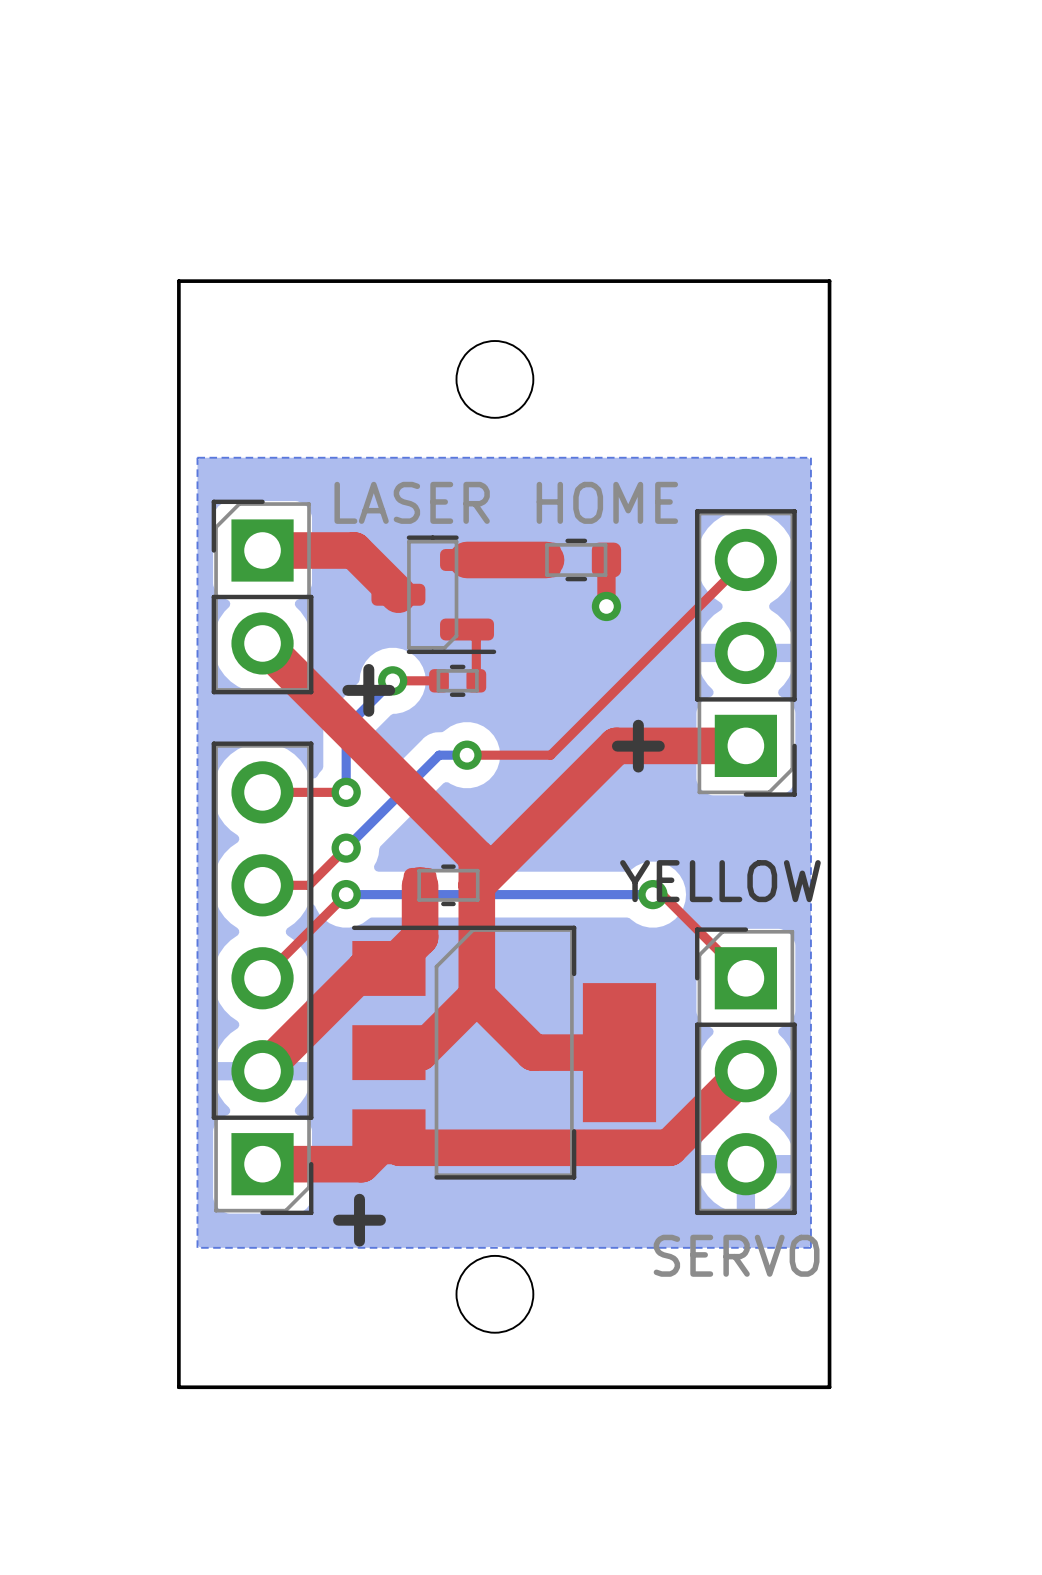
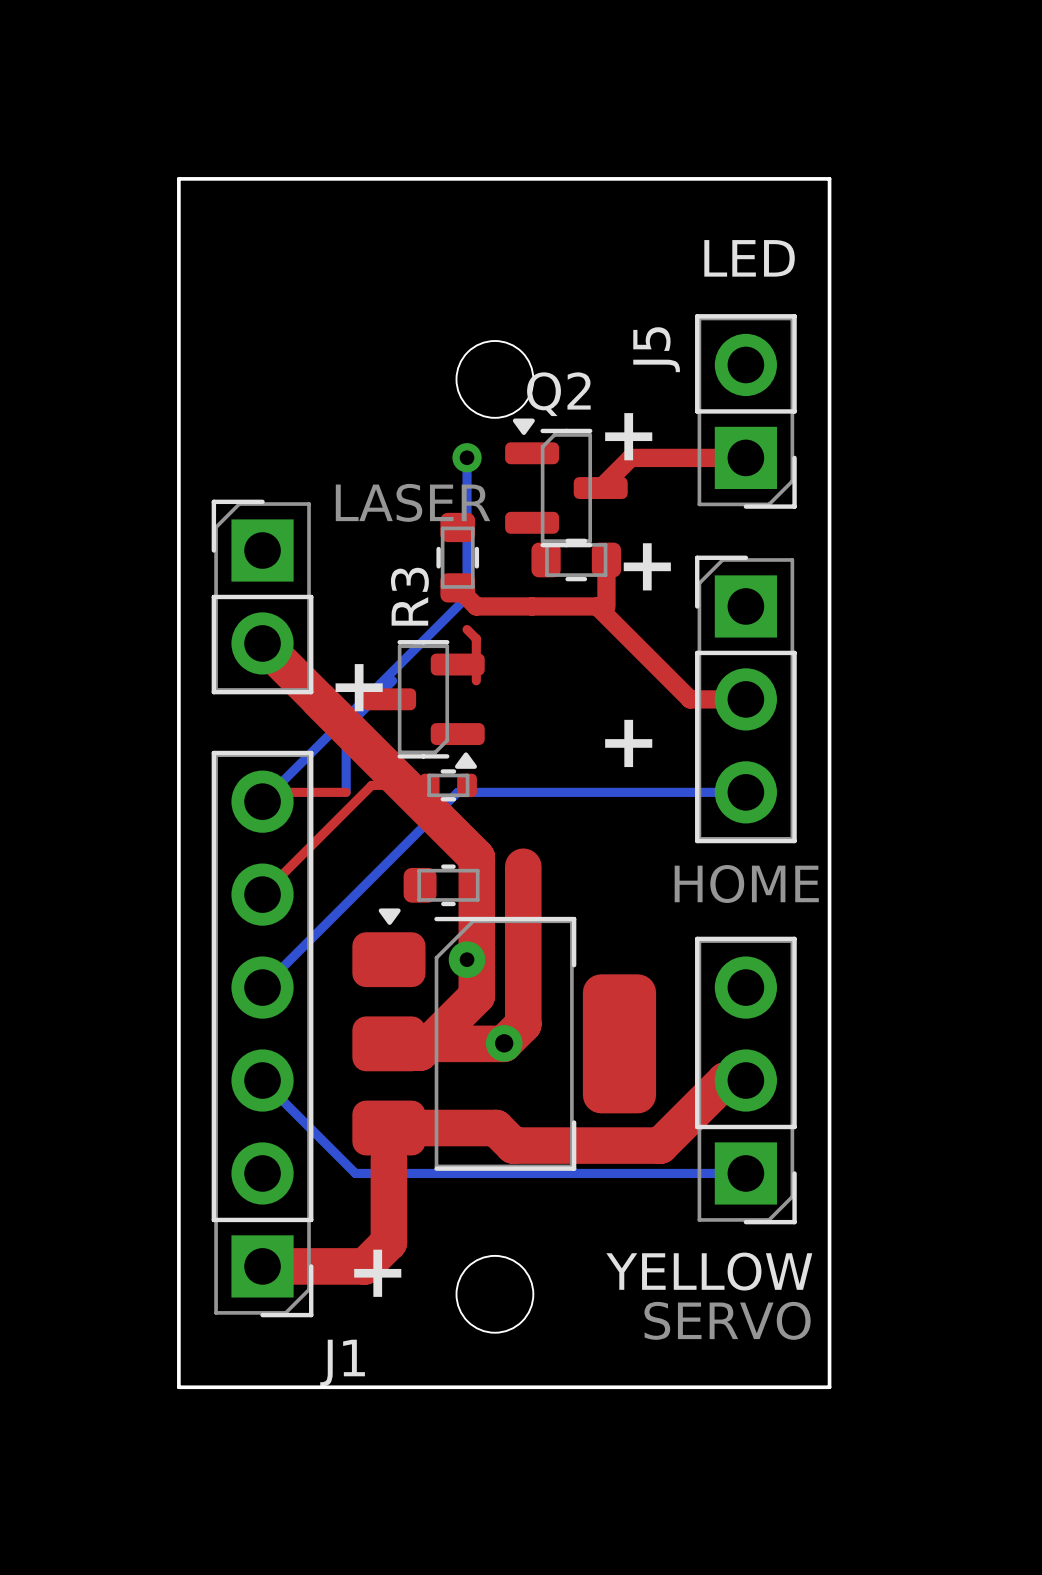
text: none -> LED (749, 258)
board edge: (178, 281) (829, 281) -> (178, 281) (178, 178) (829, 178) (829, 281)
J5: none -> (745, 411)
text: none -> + (628, 436)
bottom zone outline: (197, 457) (810, 457) (810, 1247) (197, 1247) (197, 457) -> none
bottom track: none -> (467, 457) (467, 597) (262, 801)
via: none -> (467, 457)
top track: none -> (745, 457) (630, 457) (600, 488)
Q2: none -> (566, 482)
part value position: HOME (607, 502) -> HOME (746, 883)
top track: (262, 550) (354, 550) (398, 594) -> none
R3: none -> (457, 557)
top track: (467, 559) (546, 559) -> none
top track: (745, 559) (550, 755) (467, 755) -> none
text: none -> + (647, 566)
top track: none -> (457, 587) (476, 606) (597, 606) (690, 699) (745, 699)
part: (433, 594) -> none
via: (606, 606) -> none
part rotation: 0° (745, 652) -> 180° (745, 699)
top track: (392, 680) (439, 680) -> none
via: (392, 680) -> none
part position: (457, 680) -> (448, 785)
part: none -> (423, 704)
top track: (745, 745) (616, 745) (476, 885) -> none
bottom track: (467, 755) (439, 755) (346, 848) -> none
via: (467, 755) -> none
top track: none -> (429, 785) (371, 785) (262, 894)
via: (346, 792) -> none
bottom track: none -> (745, 792) (457, 792) (262, 987)
top track: (346, 848) (309, 885) (262, 885) -> none
via: (346, 848) -> none
top track: none -> (523, 866) (523, 1024) (503, 1043) (388, 1043)
text position: YELLOW (720, 881) -> YELLOW (709, 1271)
top track: (420, 885) (420, 937) (388, 968) (365, 968) (262, 1071) -> none
top track: (346, 894) (262, 978) -> none
bottom track: (346, 894) (652, 894) -> none
via: (346, 894) -> none
top track: (652, 894) (662, 894) (745, 978) -> none
via: (652, 894) -> none
part footprint: [351, 925, 657, 1180] -> [352, 908, 657, 1171]
via: none -> (467, 959)
part: (262, 978) -> none
top track: (476, 995) (533, 1052) (619, 1052) -> none
J1: none -> (262, 1034)
via: none -> (504, 1043)
top track: (745, 1071) (669, 1147) (399, 1147) (388, 1136) (361, 1164) (262, 1164) -> none
part rotation: 0° (745, 1071) -> 180° (745, 1080)
bottom track: none -> (262, 1080) (355, 1173) (745, 1173)
top track: none -> (745, 1080) (725, 1080) (660, 1145) (513, 1145) (495, 1128) (388, 1128)
top track: none -> (388, 1158) (388, 1242) (364, 1266) (262, 1266)
text position: + (359, 1220) -> + (377, 1273)

